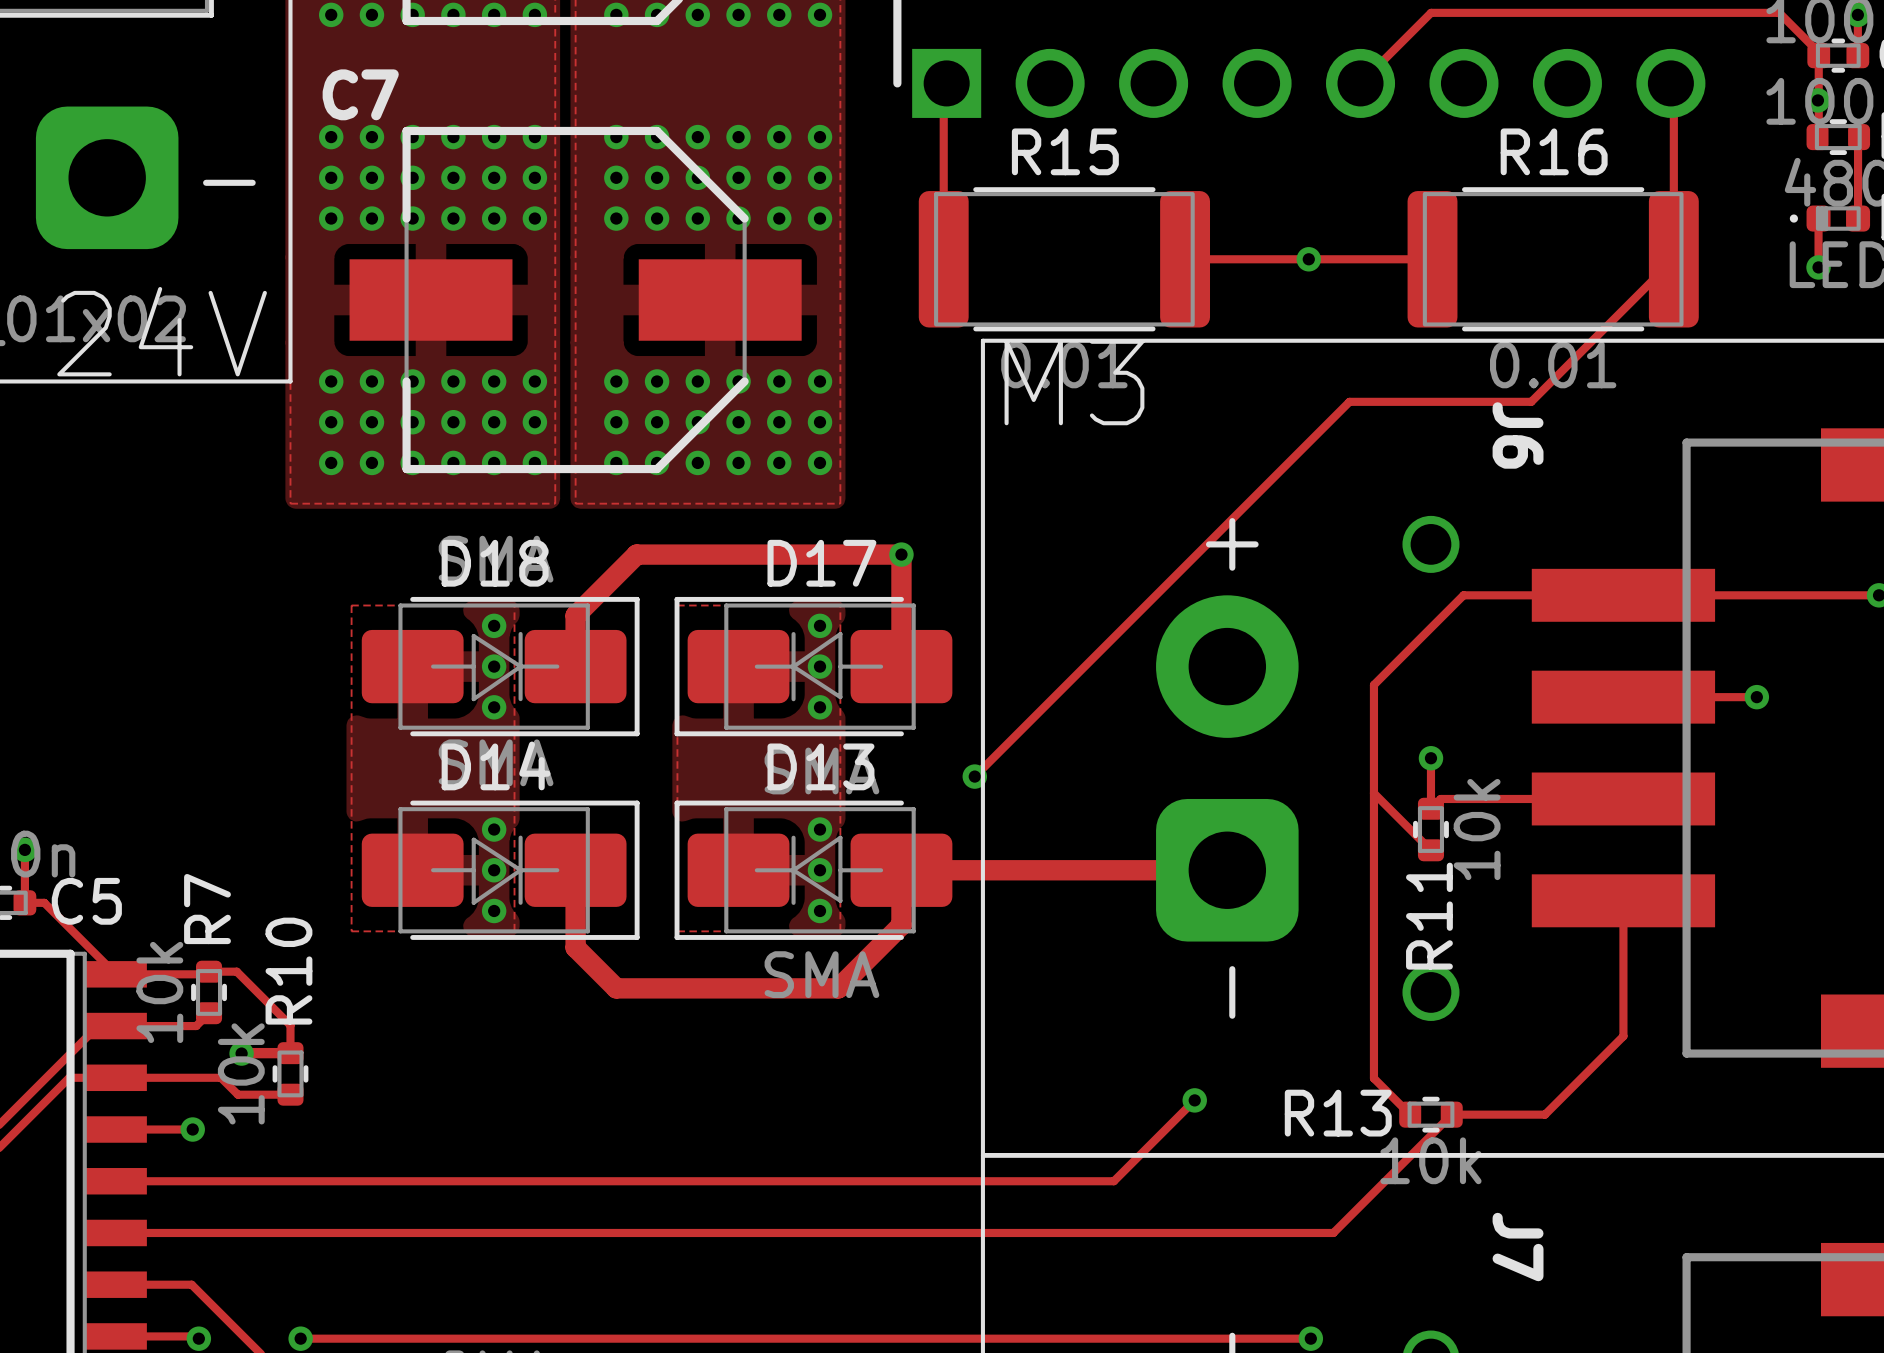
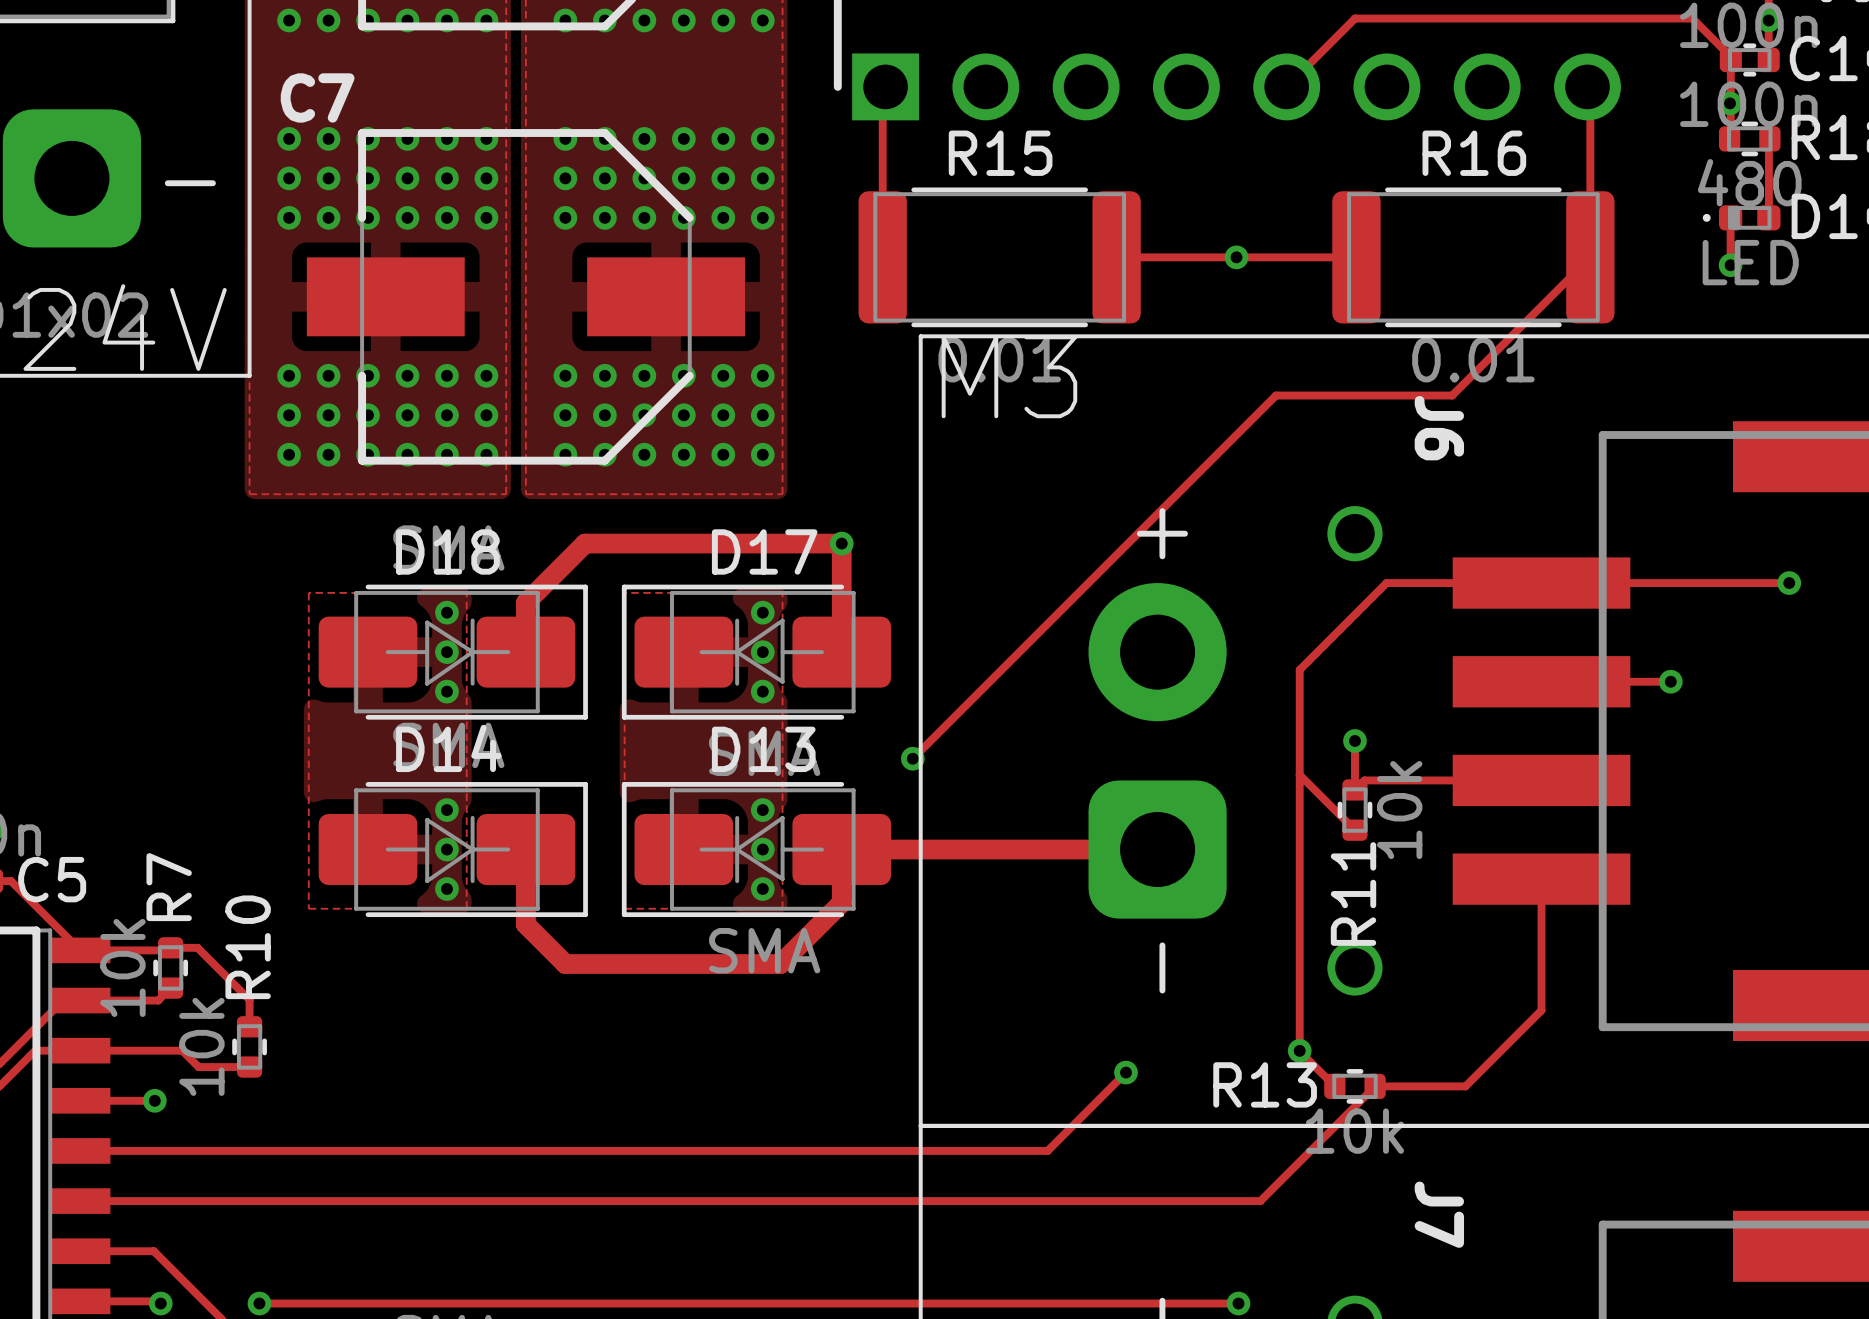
via: (241, 1053) -> none
track: (242, 1053) (290, 1053) -> none
via: none -> (1299, 1050)

